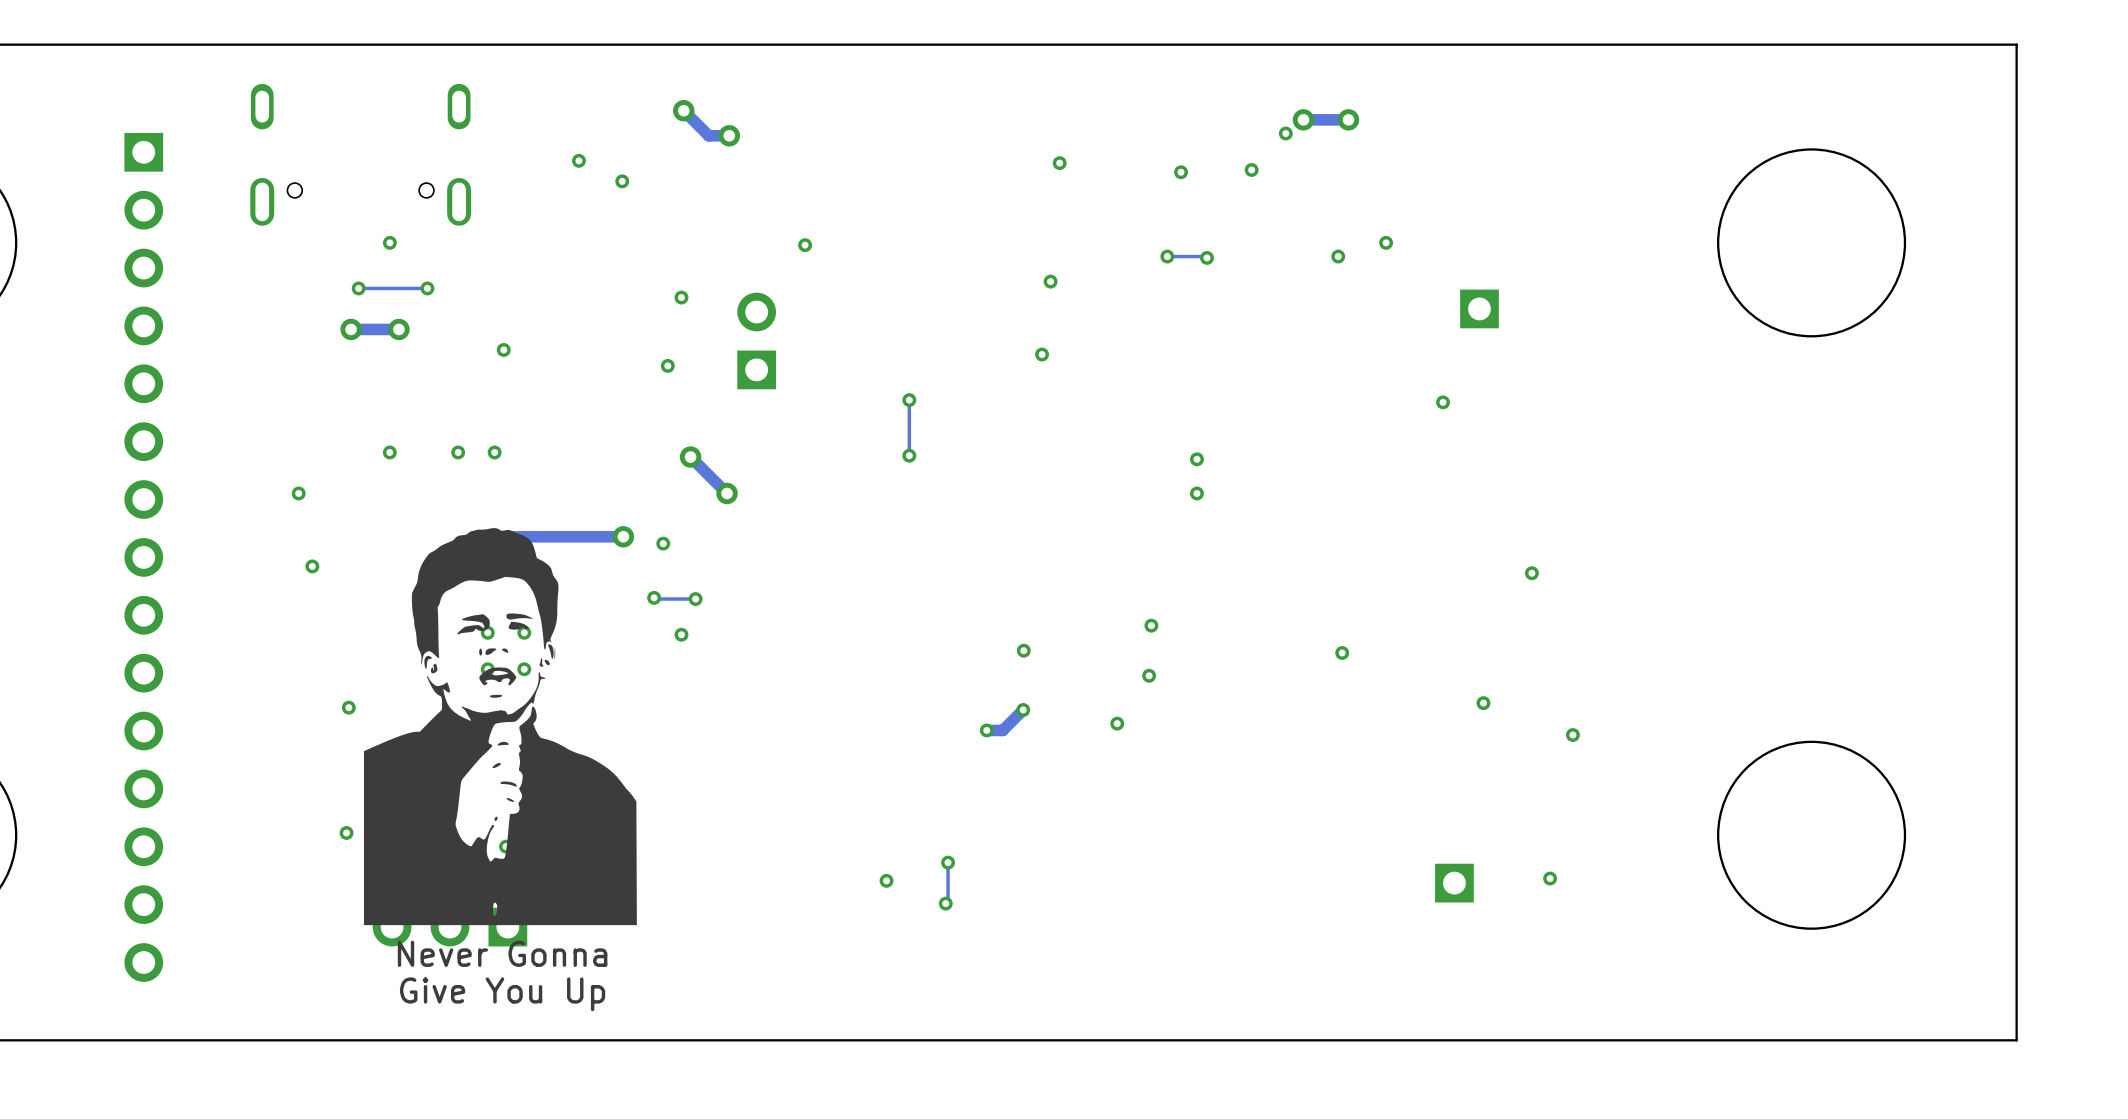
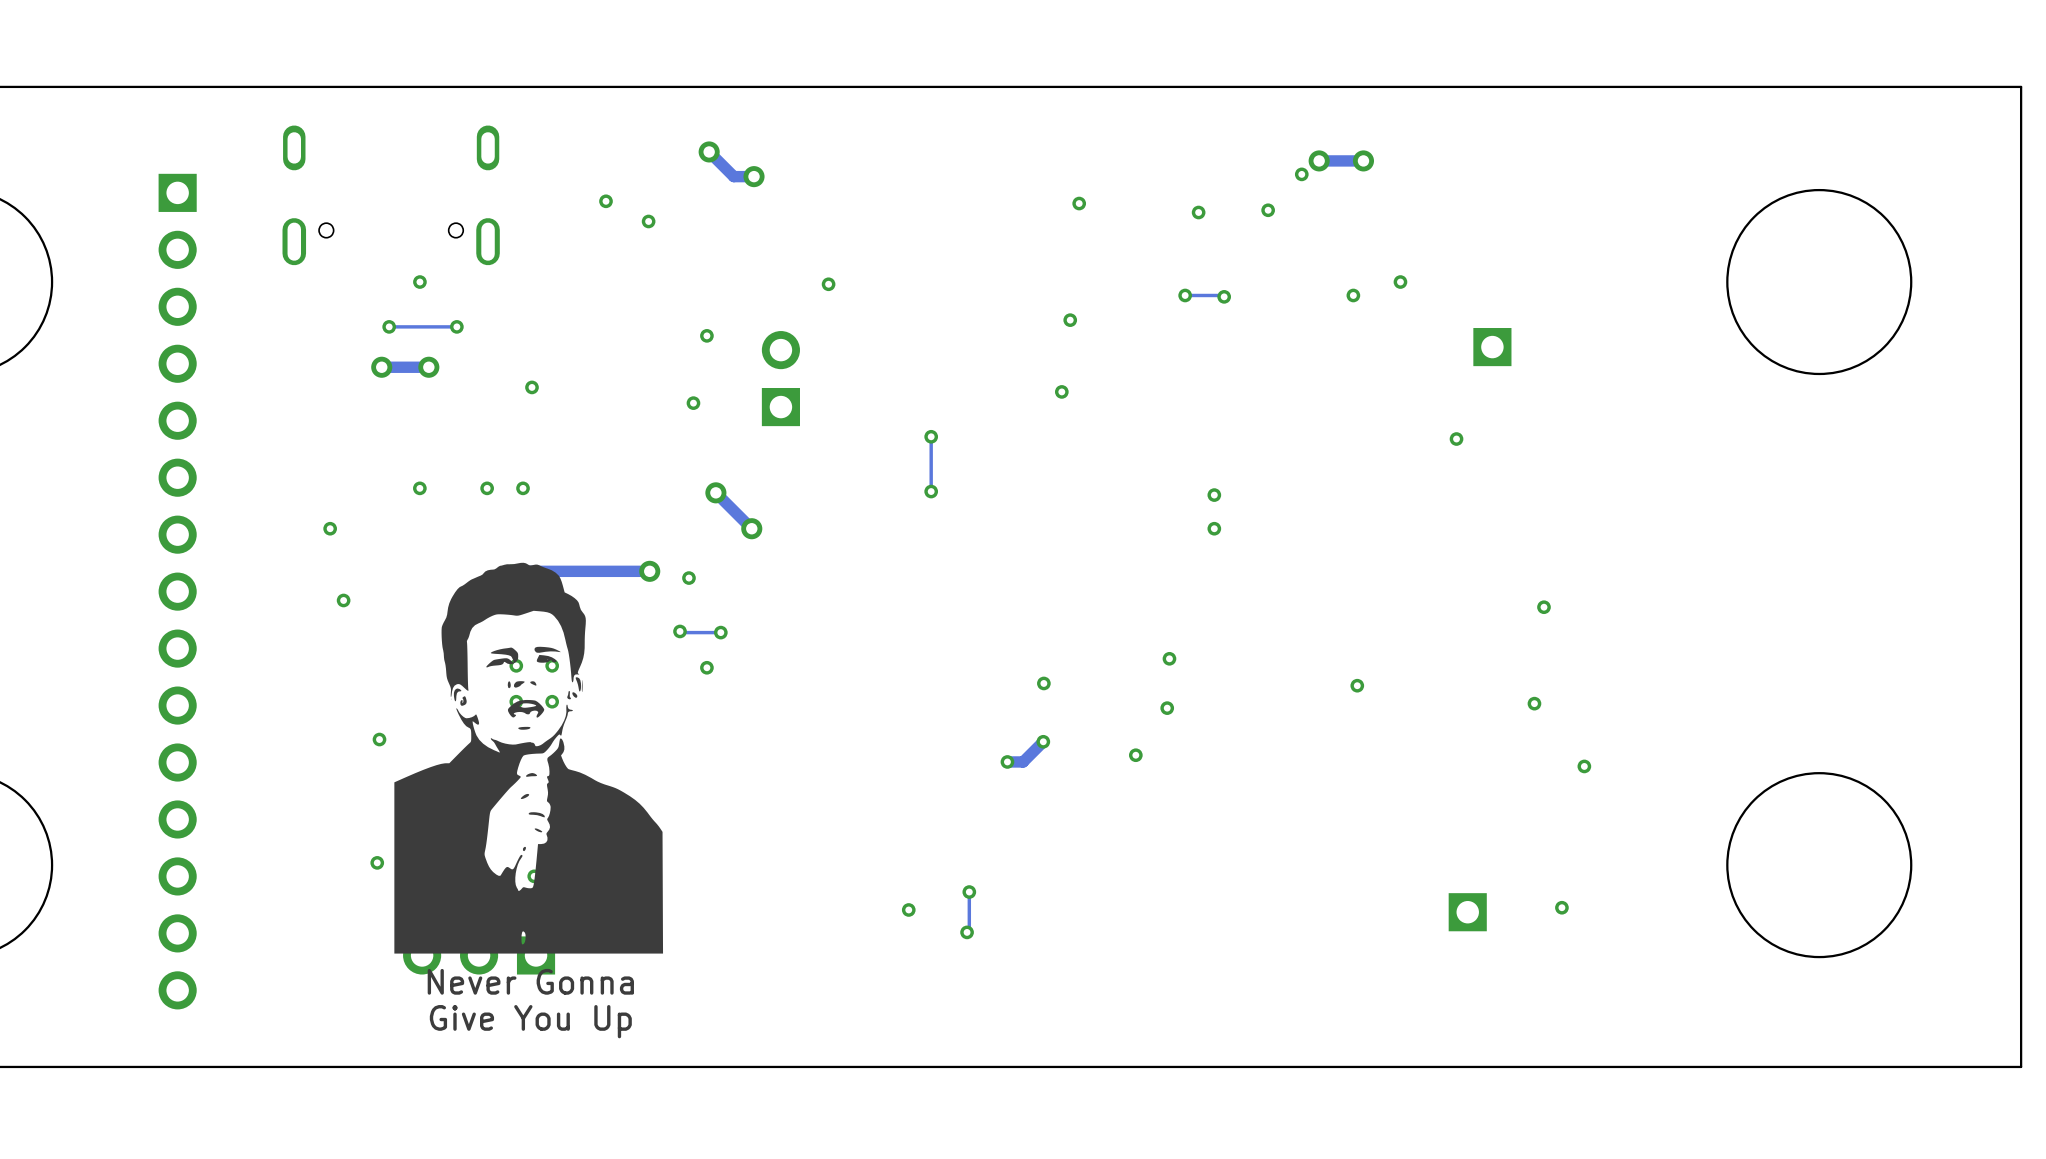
via position: (1483, 703) -> (1534, 703)

